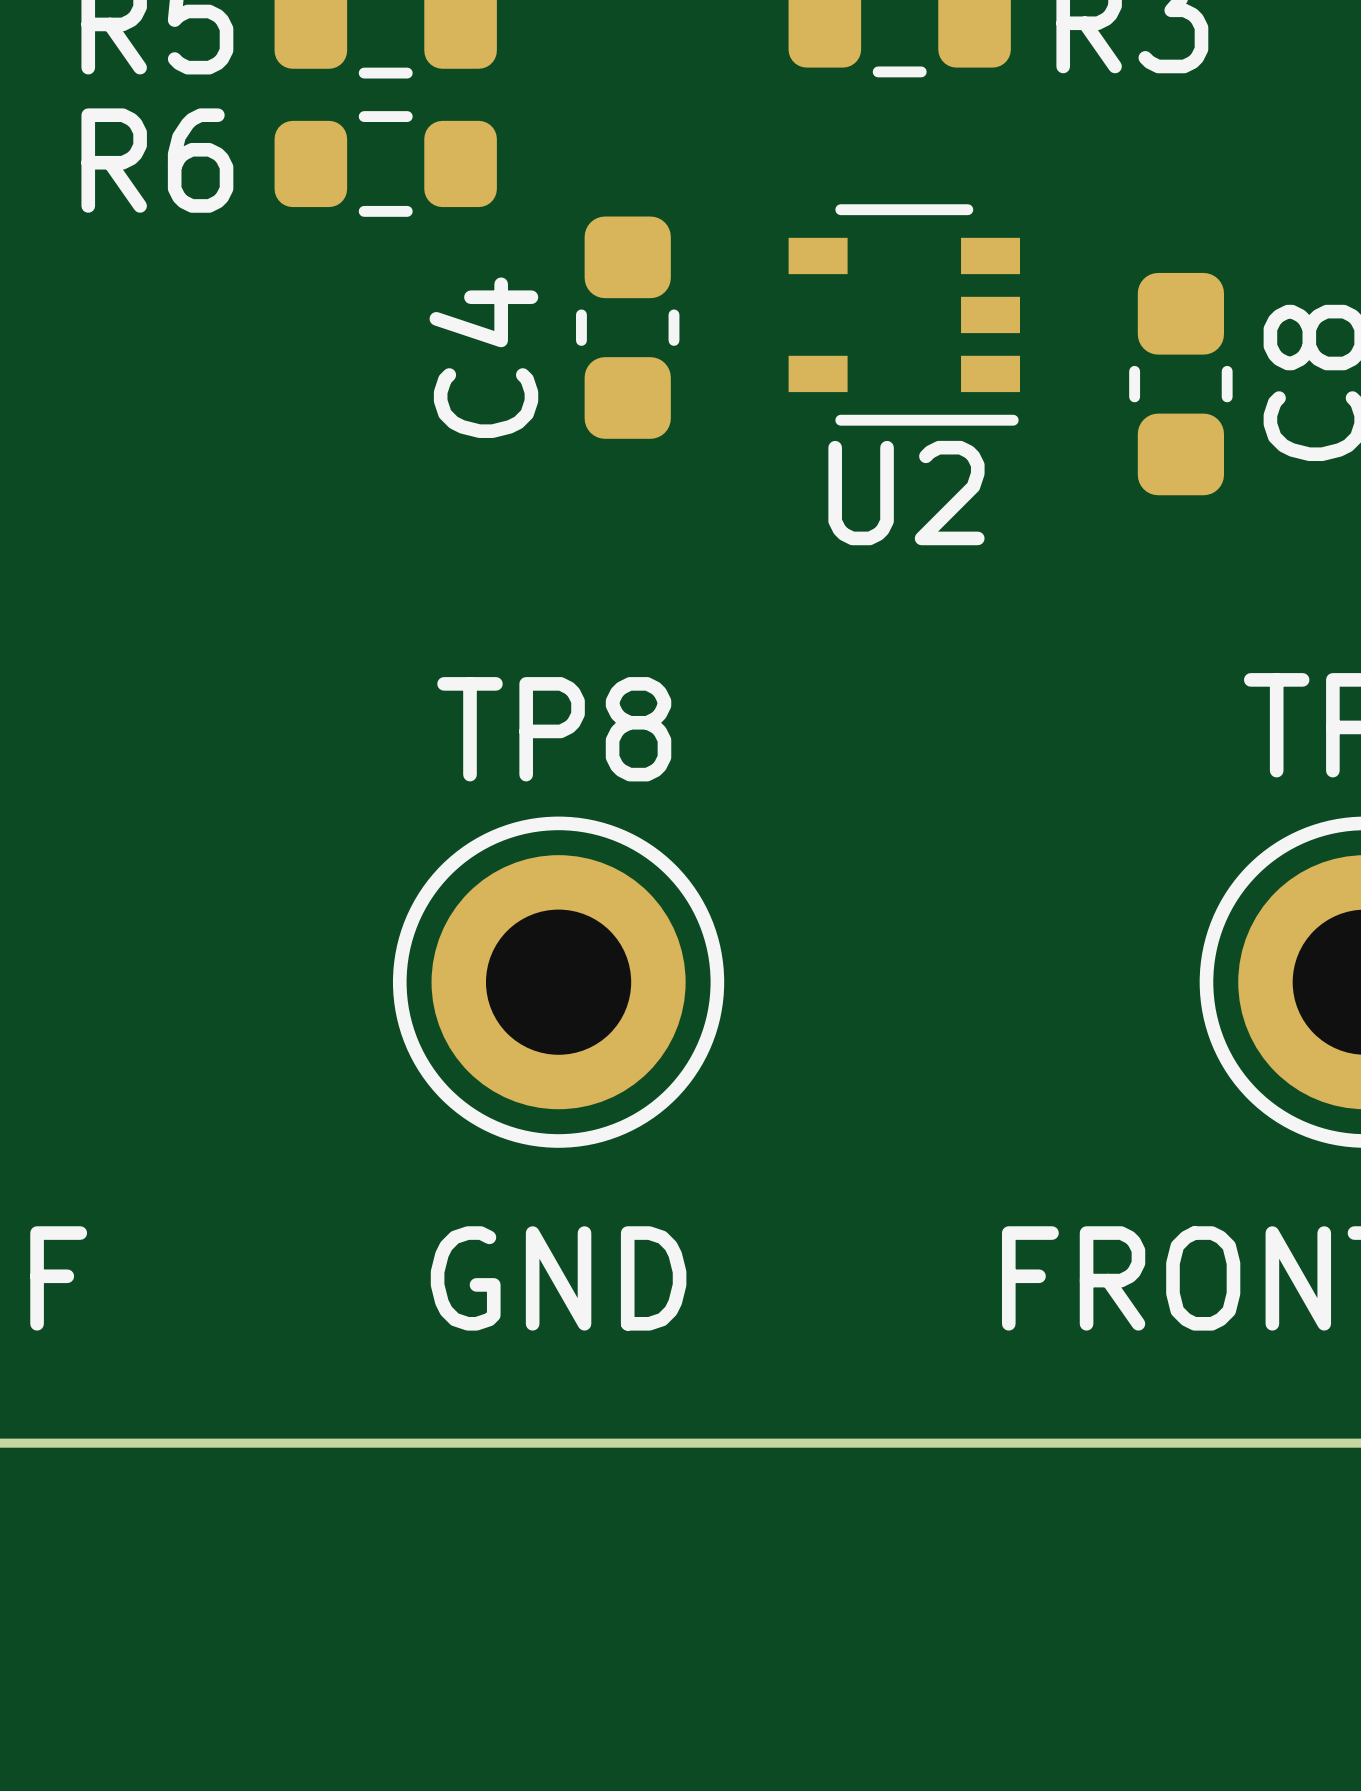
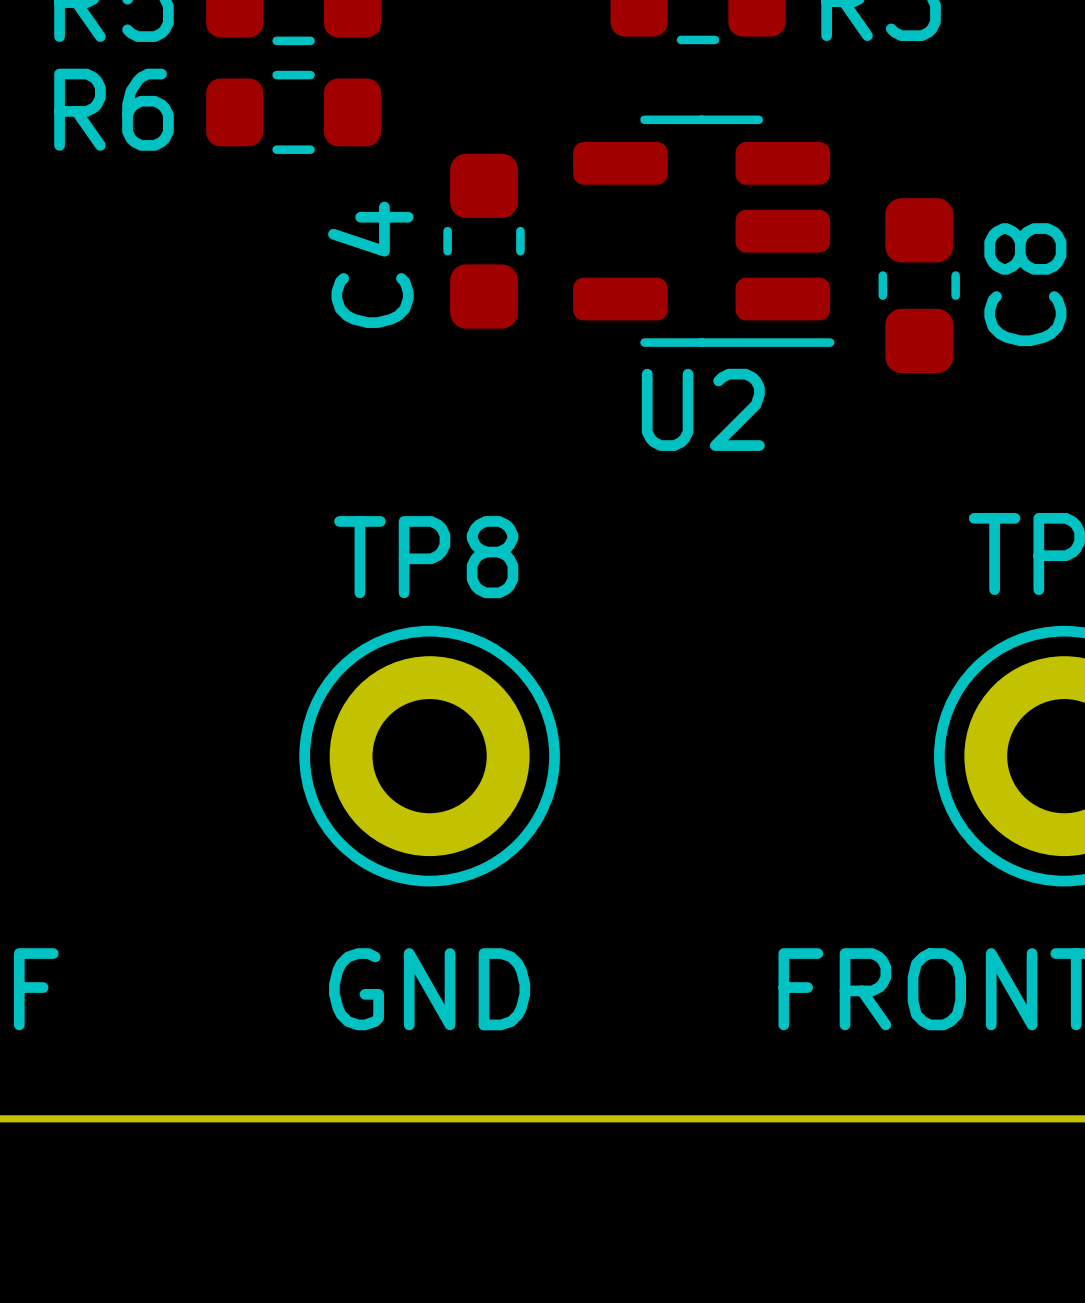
U2 footprint: [788, 204, 1021, 426] -> [573, 115, 835, 347]
U2 name position: U2 (906, 493) -> U2 (703, 409)

